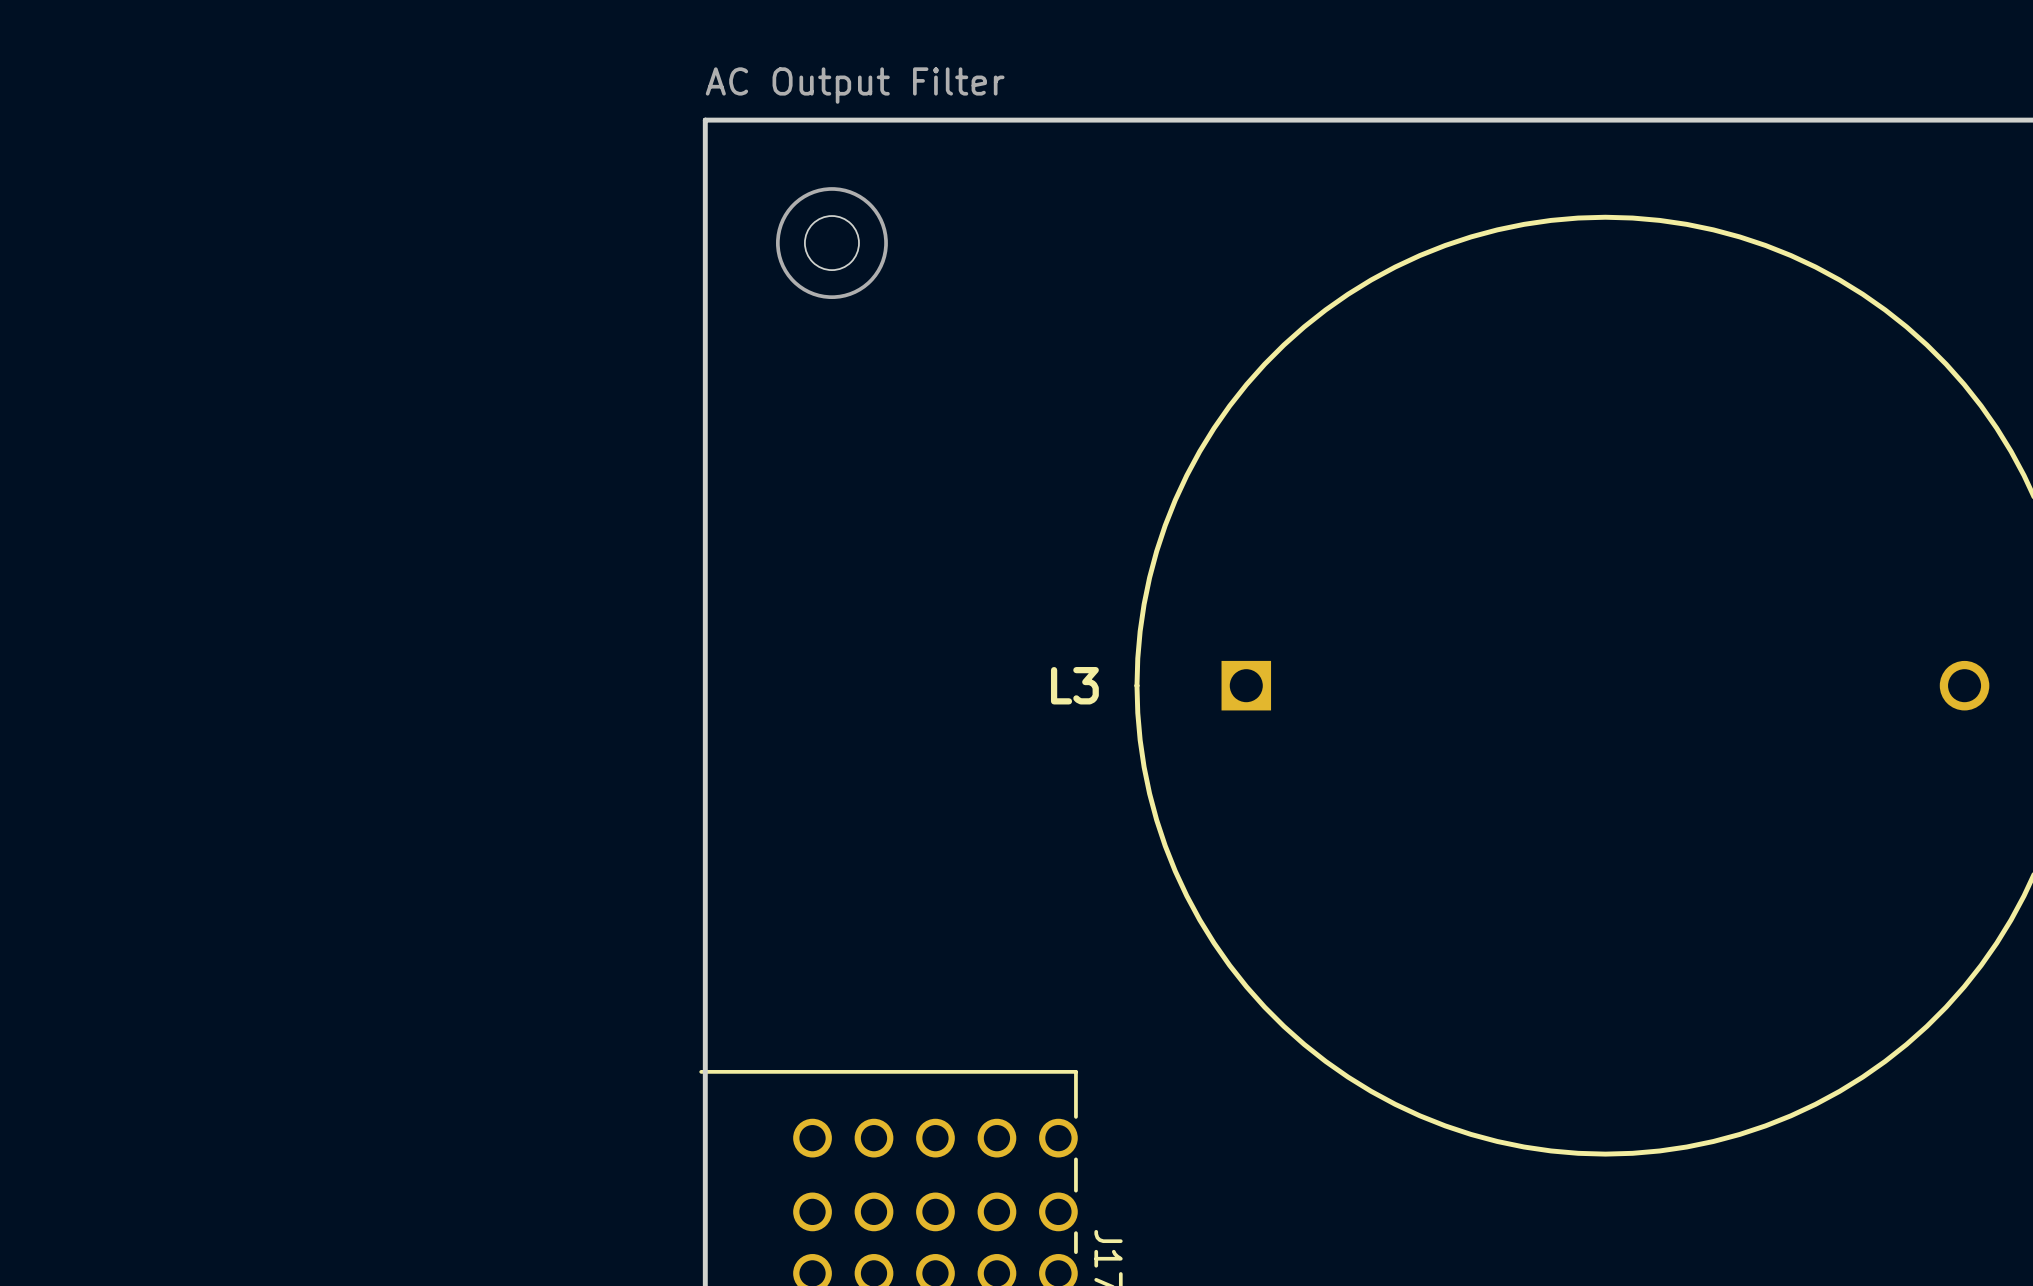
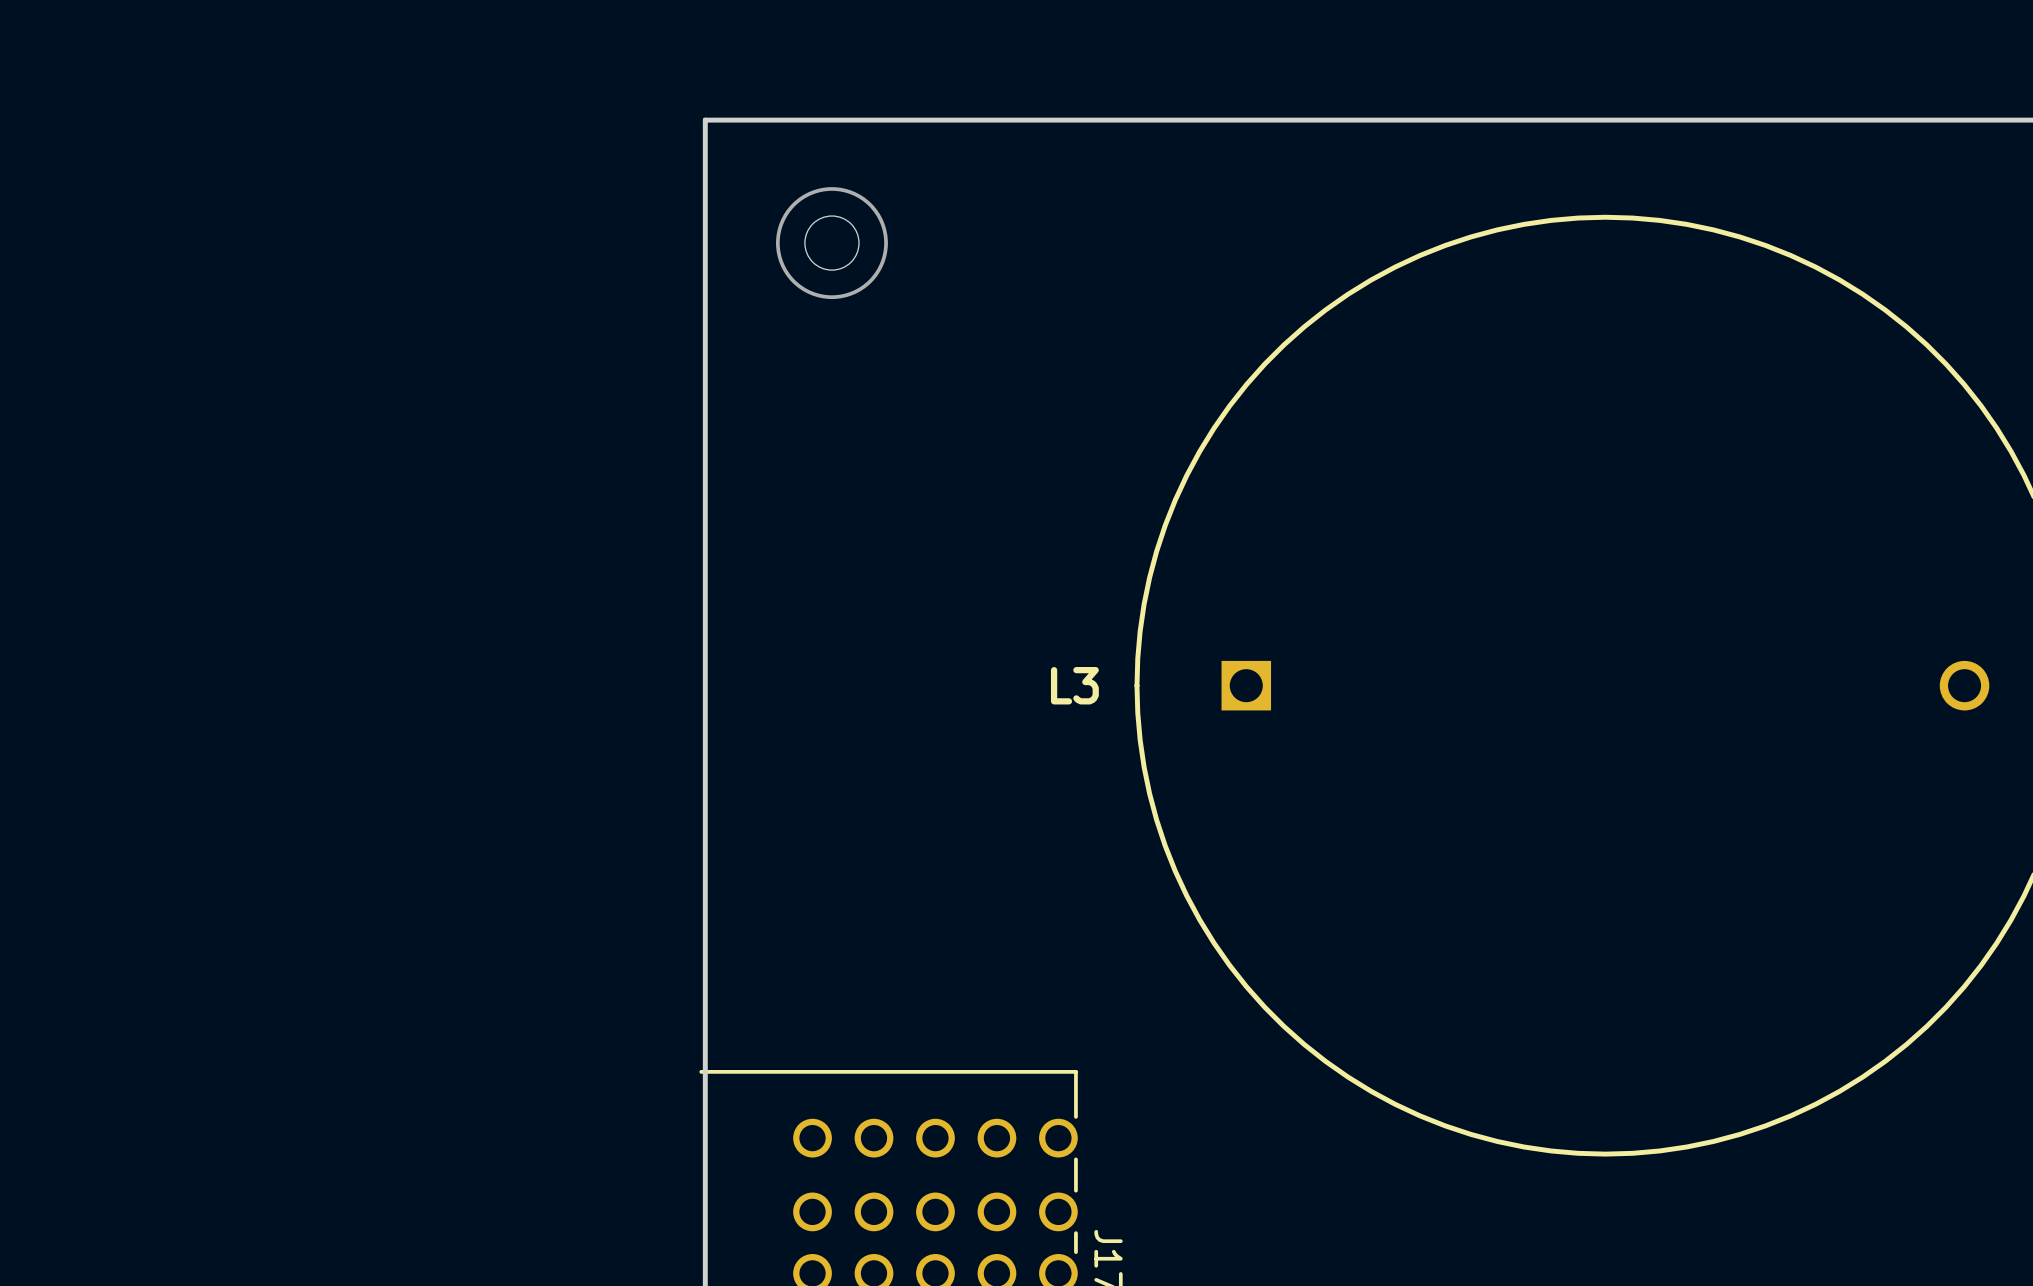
text: AC Output Filter (855, 85) -> none

